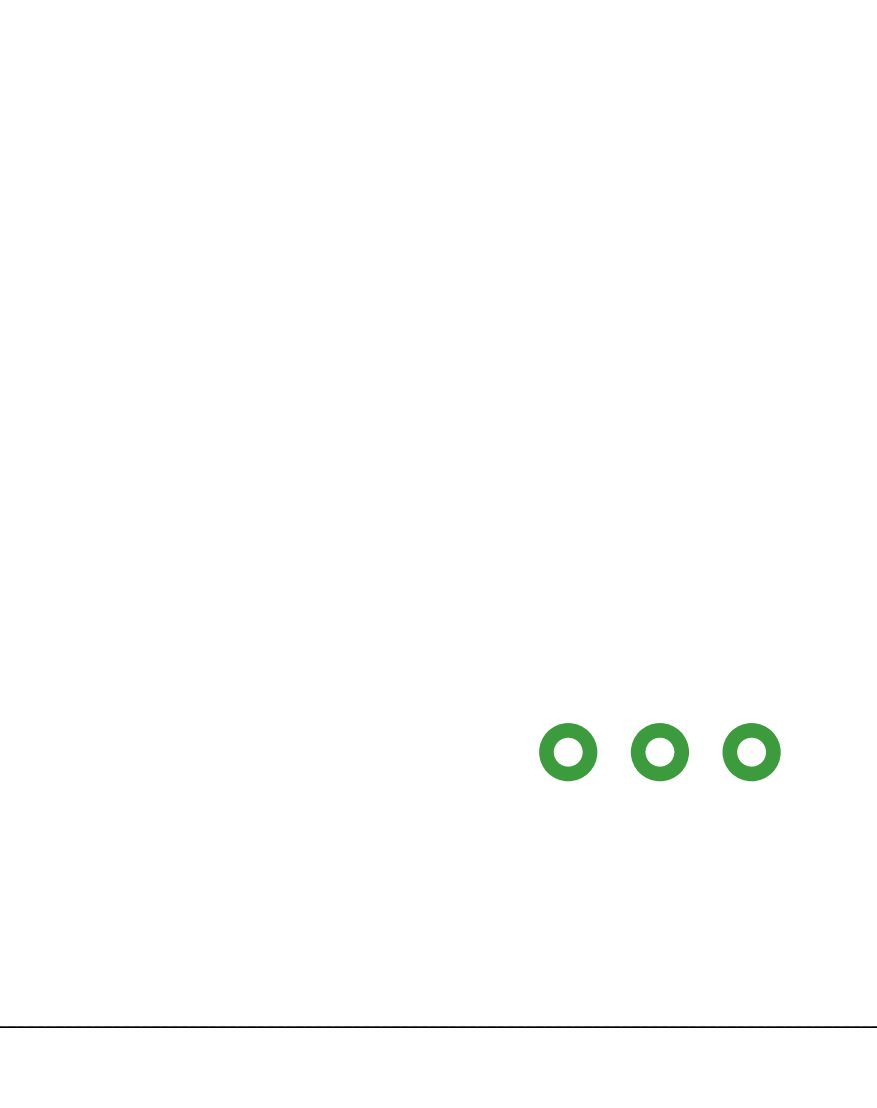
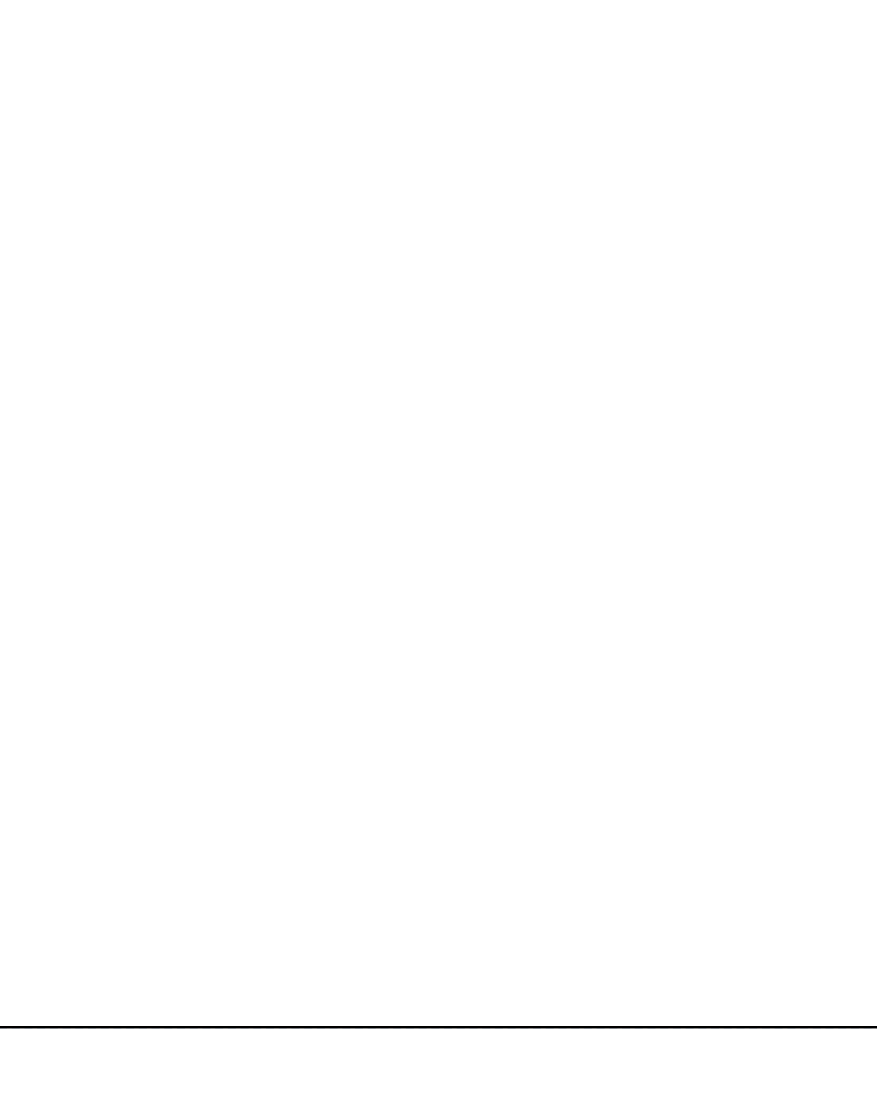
via: (568, 752) -> none
via: (659, 752) -> none
via: (751, 752) -> none

